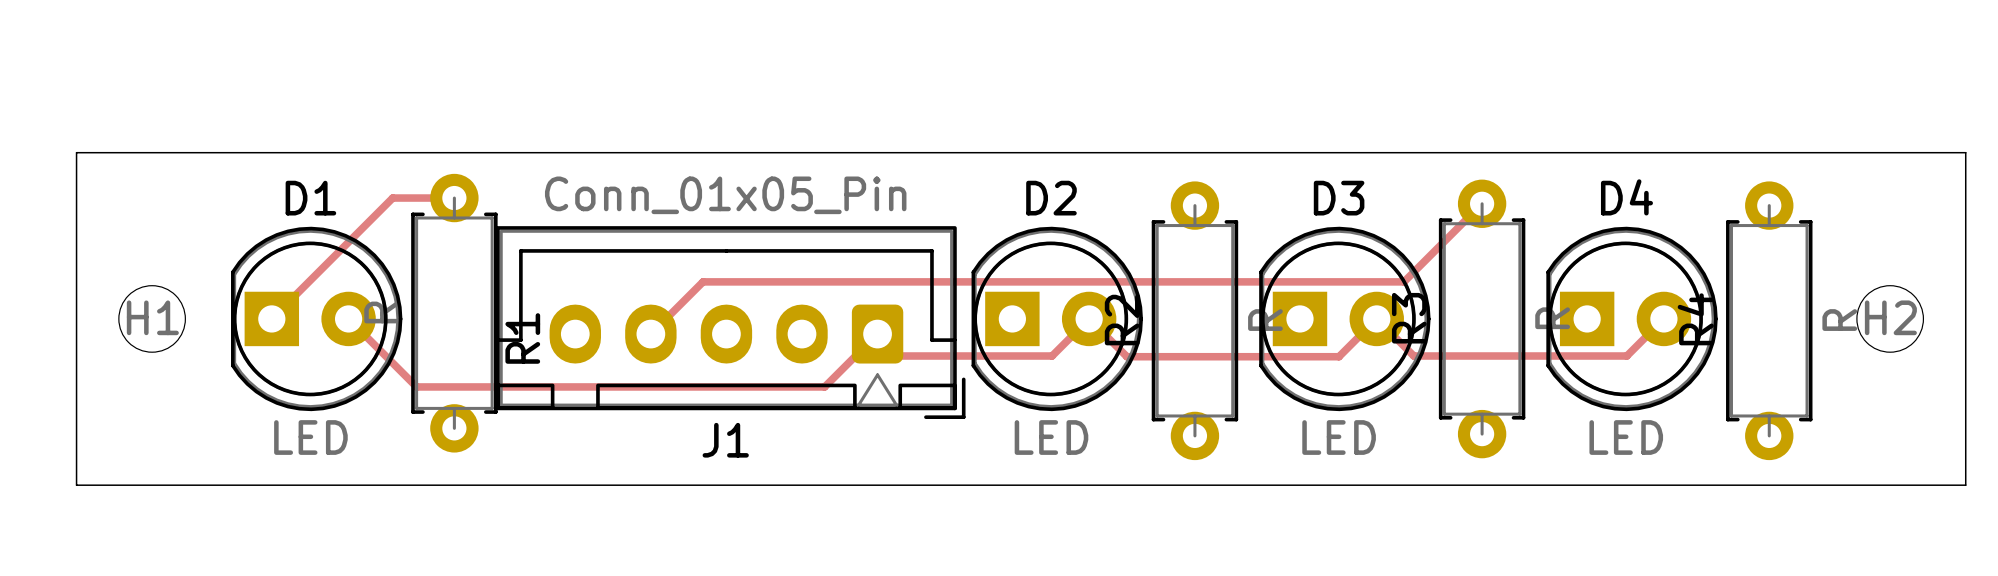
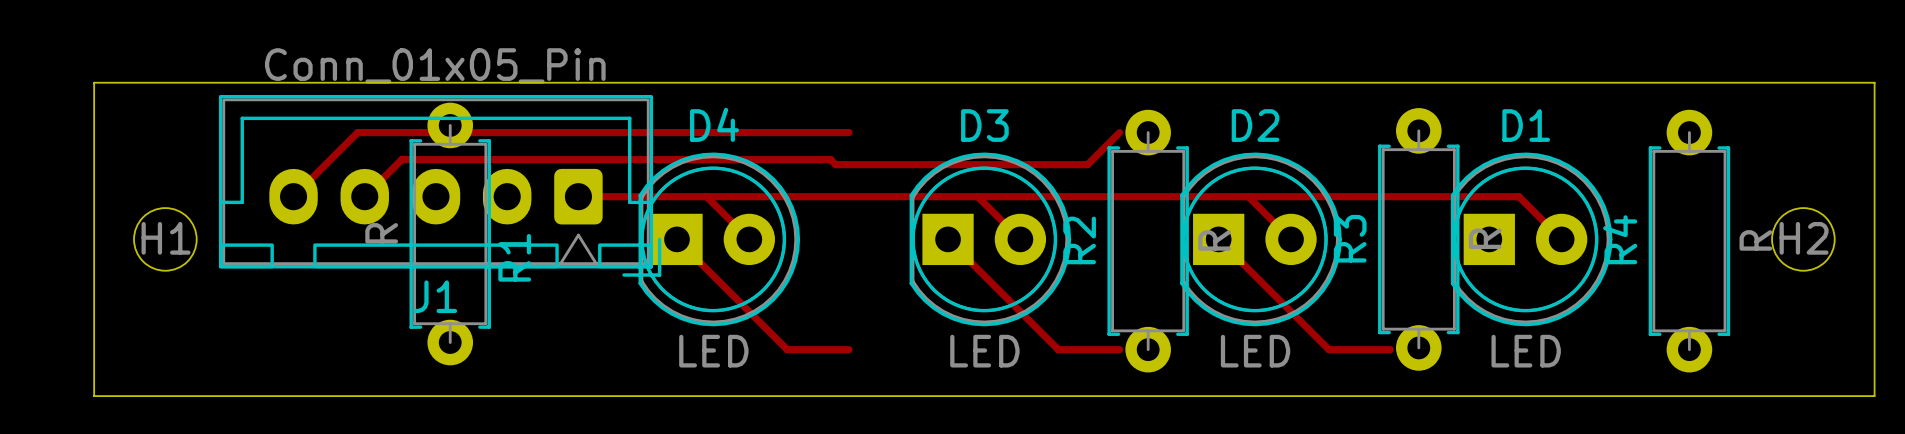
track: (454, 198) (392, 198) (271, 318) -> none
track: (1482, 203) (1403, 281) (703, 281) (650, 334) -> none
track: none -> (849, 132) (357, 132) (293, 196)
track: none -> (1119, 132) (1087, 164) (835, 164) (830, 159) (401, 159) (364, 196)
track: none -> (578, 196) (1518, 196) (1561, 239)
track: none -> (706, 196) (749, 239)
track: none -> (977, 196) (1020, 239)
track: none -> (1248, 196) (1291, 239)
D1 position: (316, 318) -> (1531, 239)
track: (348, 318) (416, 386) (824, 386) (877, 334) (899, 356) (1052, 356) (1089, 318) (1126, 356) (1338, 356) (1376, 318) (1413, 356) (1626, 356) (1663, 318) -> none
track: none -> (676, 239) (787, 349) (849, 349)
track: none -> (948, 239) (1058, 349) (1119, 349)
D2 position: (1057, 318) -> (1260, 239)
track: none -> (1218, 239) (1328, 349) (1390, 349)
D3 position: (1344, 318) -> (990, 239)
D4 position: (1632, 318) -> (719, 239)
J1 position: (730, 322) -> (440, 185)

